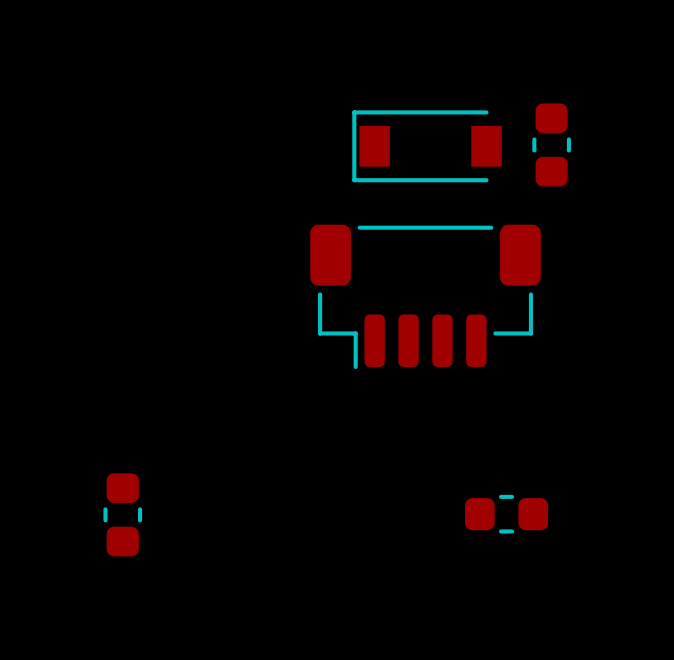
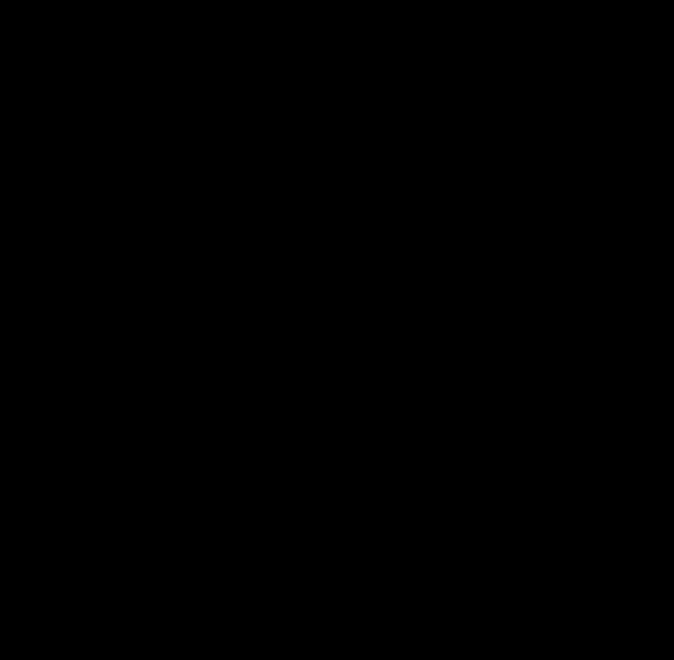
part: (551, 144) -> none
part: (427, 146) -> none
part: (425, 296) -> none
part: (122, 514) -> none
part: (506, 514) -> none

